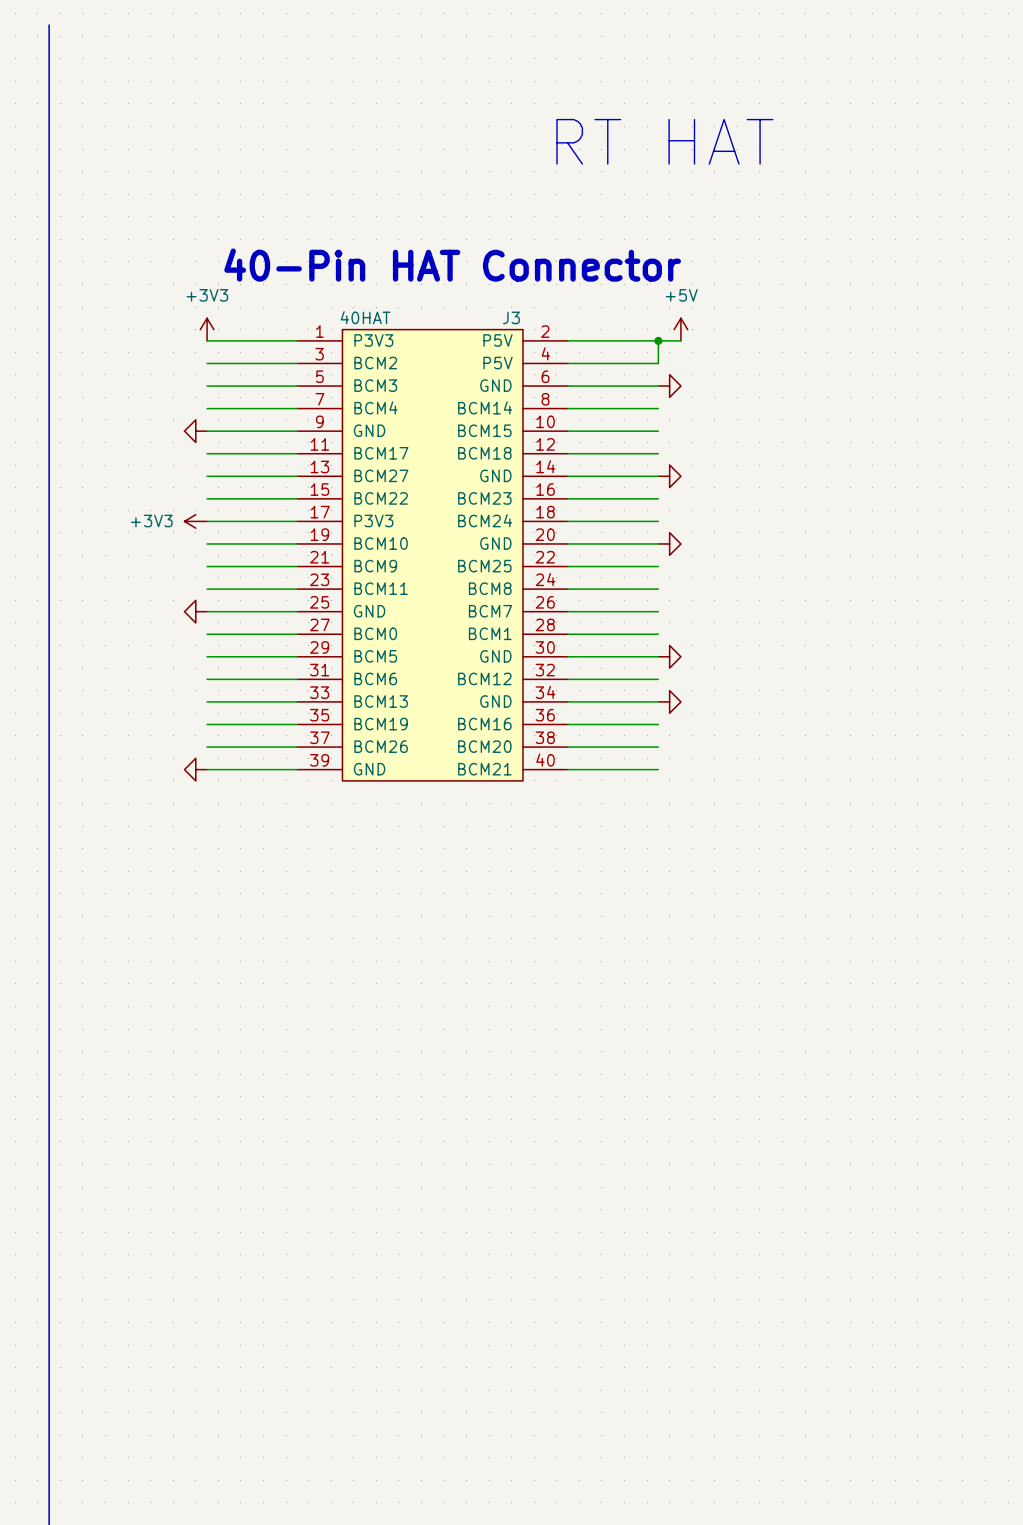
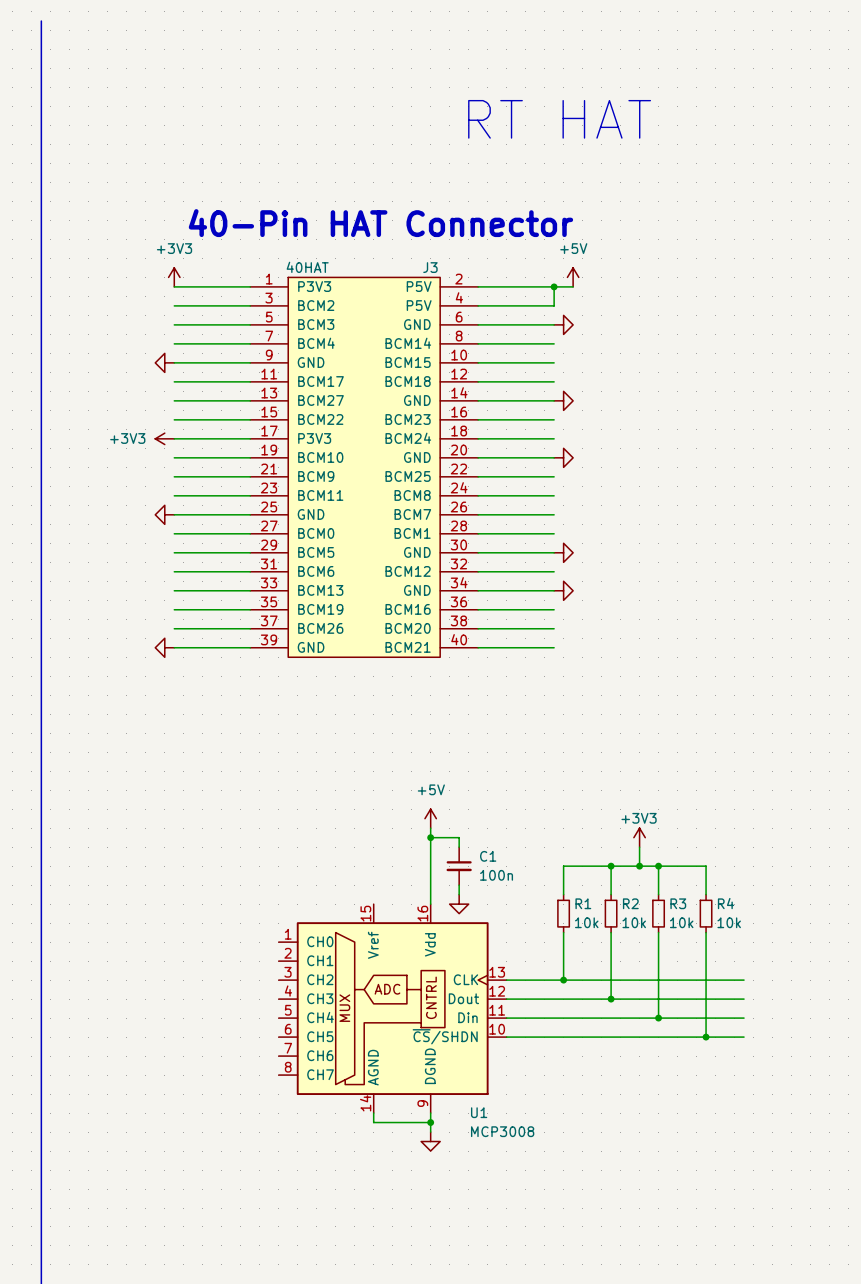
power symbol: none -> +5V (430, 818)
wire: none -> (430, 828) (430, 904)
wire: none -> (430, 837) (459, 837) (459, 847)
junction: none -> (430, 837)
power symbol: none -> +3V3 (639, 837)
wire: none -> (639, 847) (639, 866)
C1: none -> 100n (459, 866)
wire: none -> (611, 866) (611, 894)
junction: none -> (611, 866)
junction: none -> (639, 866)
wire: none -> (658, 866) (658, 894)
junction: none -> (658, 866)
wire: none -> (459, 885) (459, 894)
wire: none -> (563, 894) (563, 866) (706, 866) (706, 894)
power symbol: none -> (459, 904)
R1: none -> 10k (563, 913)
R2: none -> 10k (611, 913)
R3: none -> 10k (658, 913)
R4: none -> 10k (706, 913)
wire: none -> (563, 932) (563, 980)
wire: none -> (611, 932) (611, 999)
wire: none -> (658, 932) (658, 1018)
wire: none -> (706, 932) (706, 1037)
wire: none -> (506, 980) (744, 980)
junction: none -> (563, 980)
wire: none -> (506, 999) (744, 999)
junction: none -> (611, 999)
U1: none -> MCP3008 (392, 1008)
wire: none -> (506, 1018) (744, 1018)
junction: none -> (658, 1018)
wire: none -> (506, 1037) (744, 1037)
junction: none -> (706, 1037)
wire: none -> (373, 1113) (373, 1122) (430, 1122)
wire: none -> (430, 1113) (430, 1132)
junction: none -> (430, 1122)
power symbol: none -> (430, 1141)

